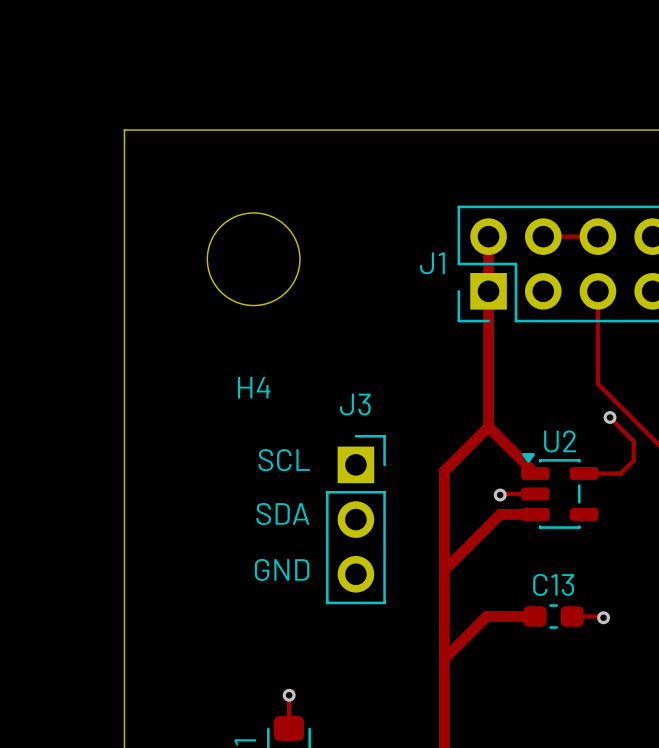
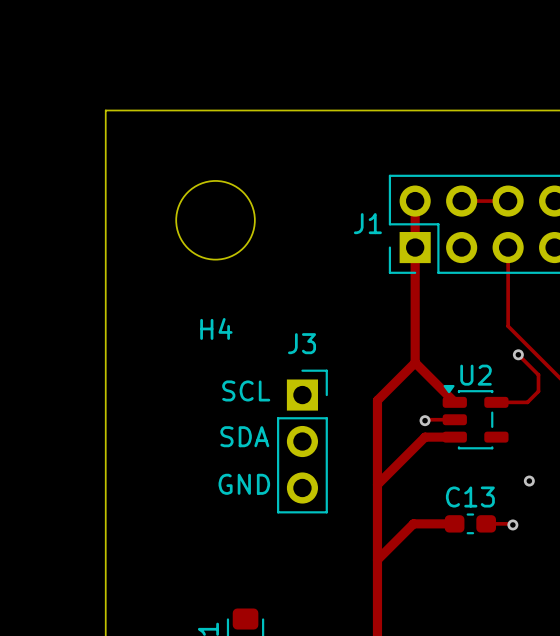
via: none -> (529, 481)
track: (288, 695) (288, 728) -> none
via: (289, 695) -> none

